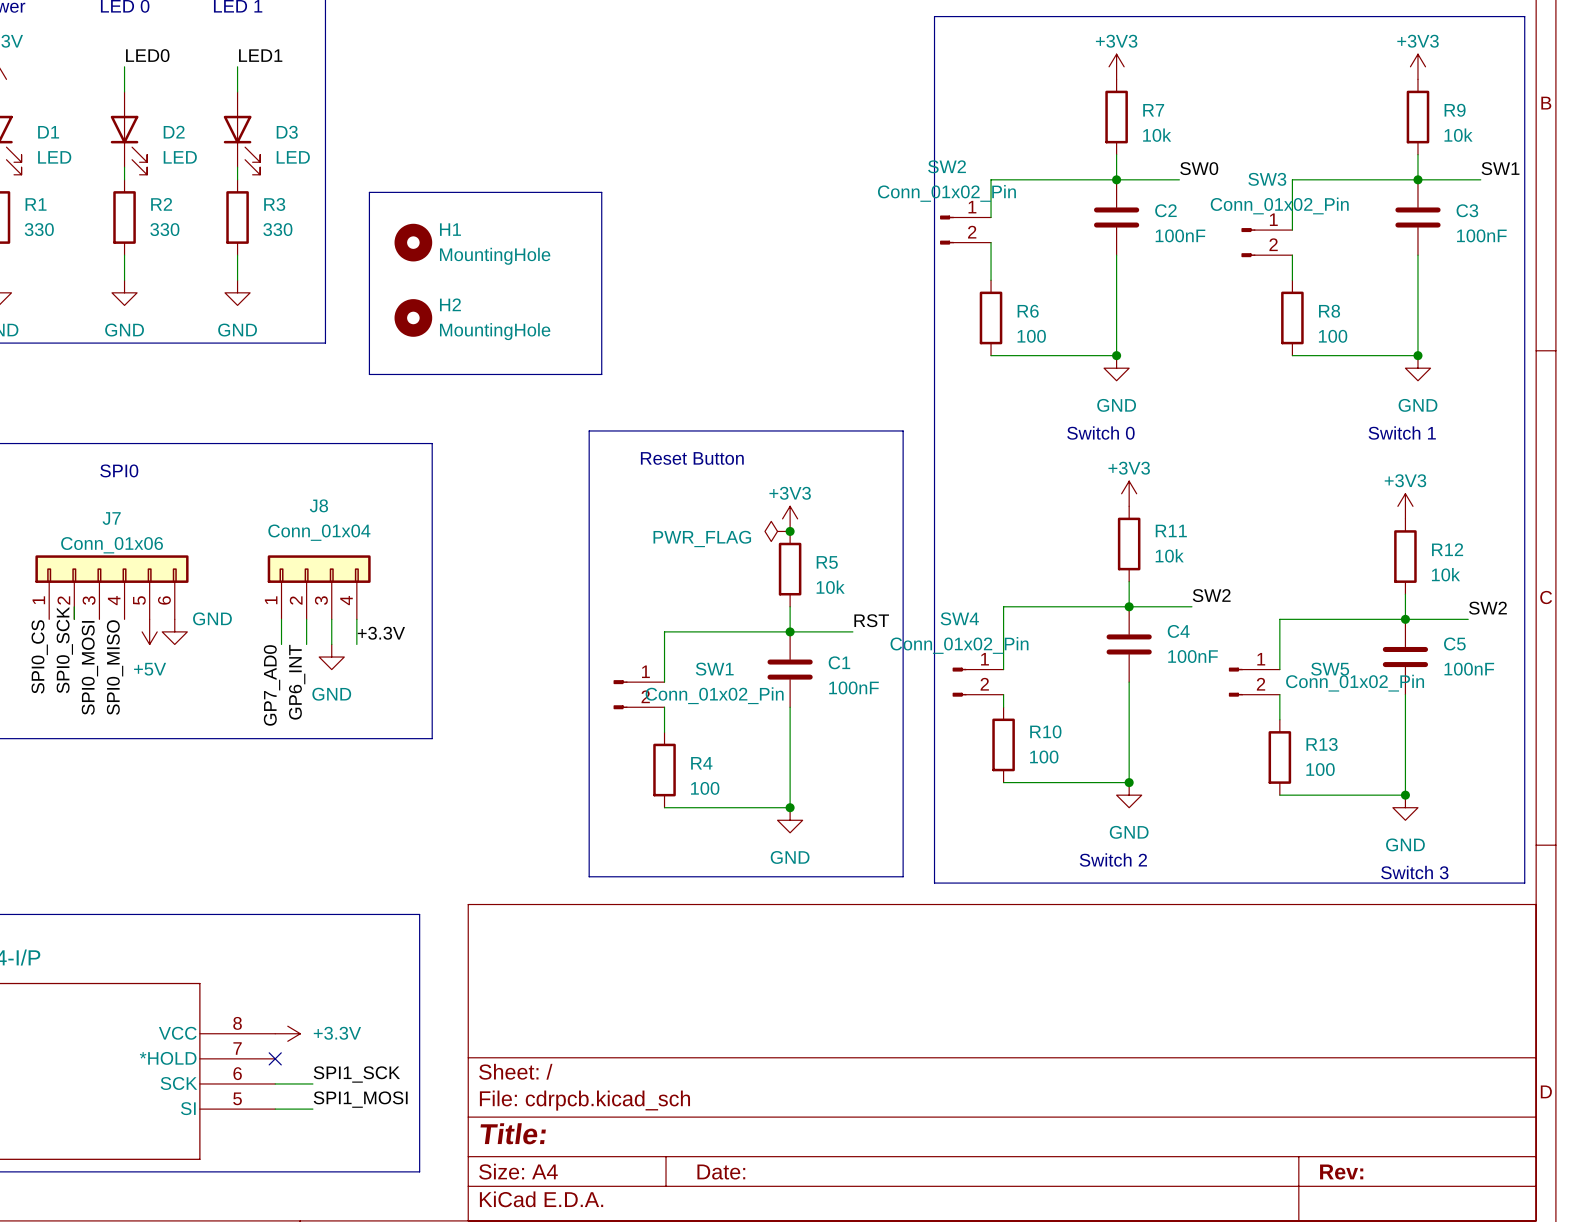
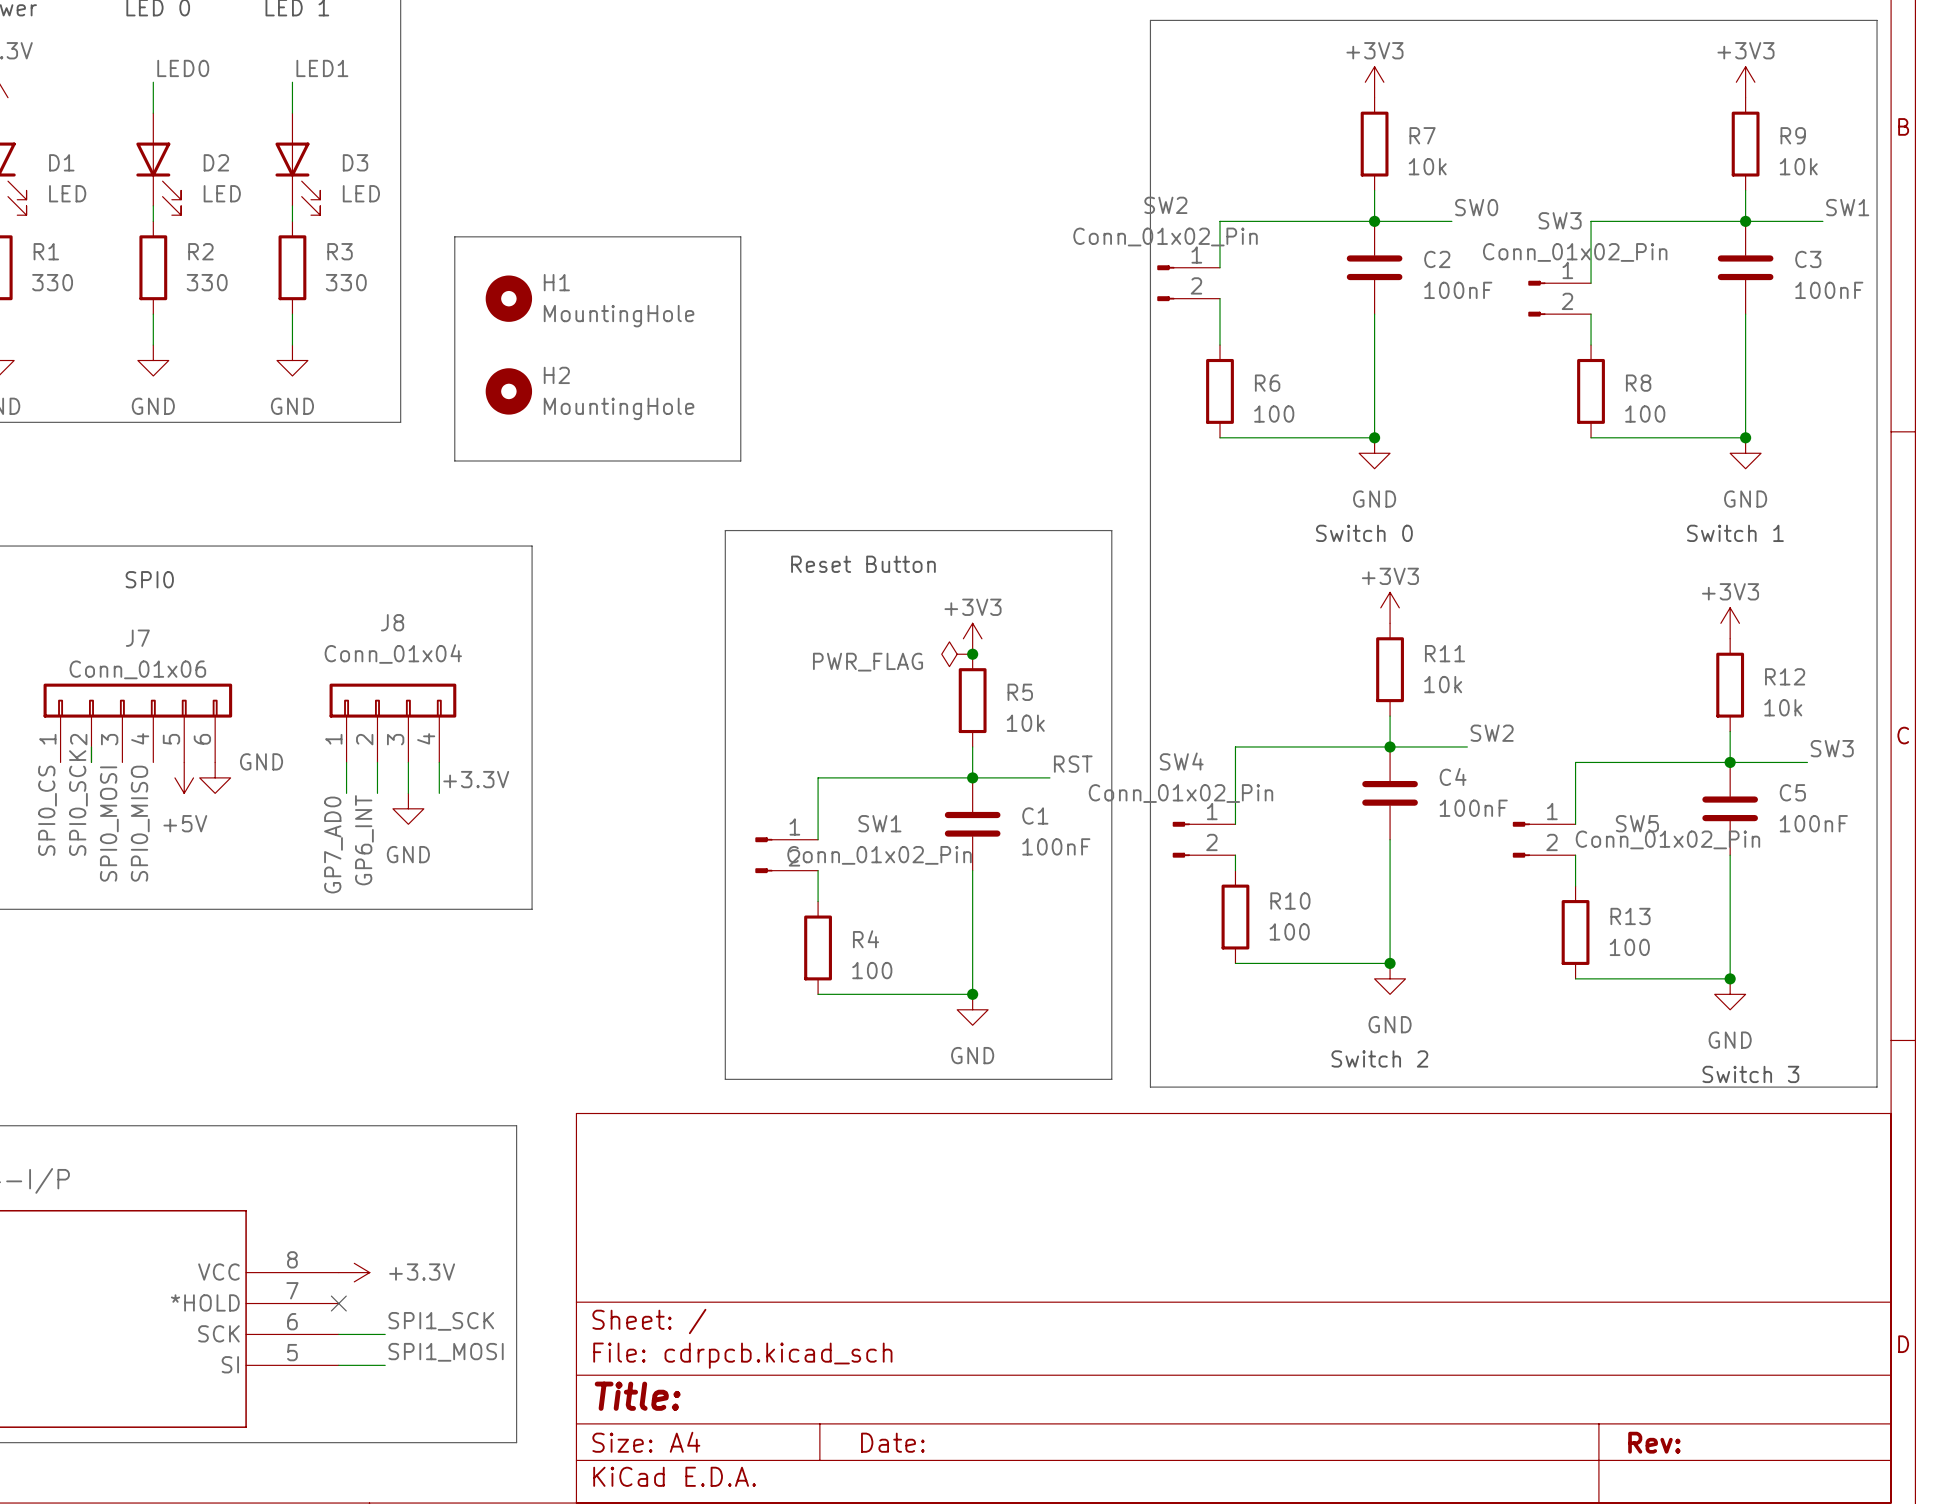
label: SW2 (1487, 608) -> SW3 (1832, 748)

